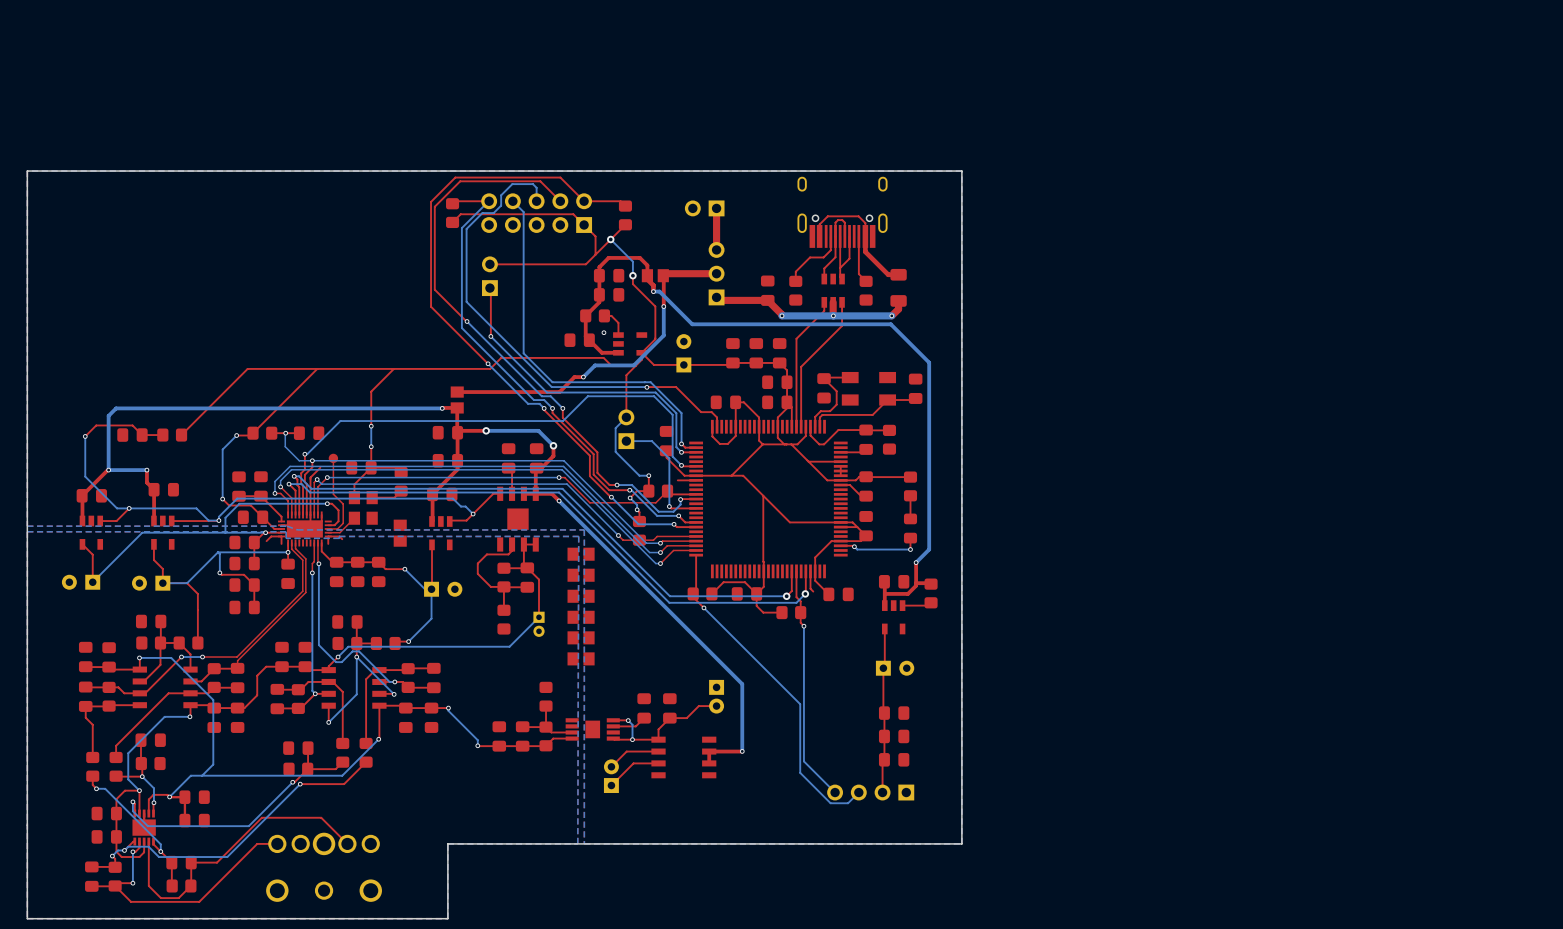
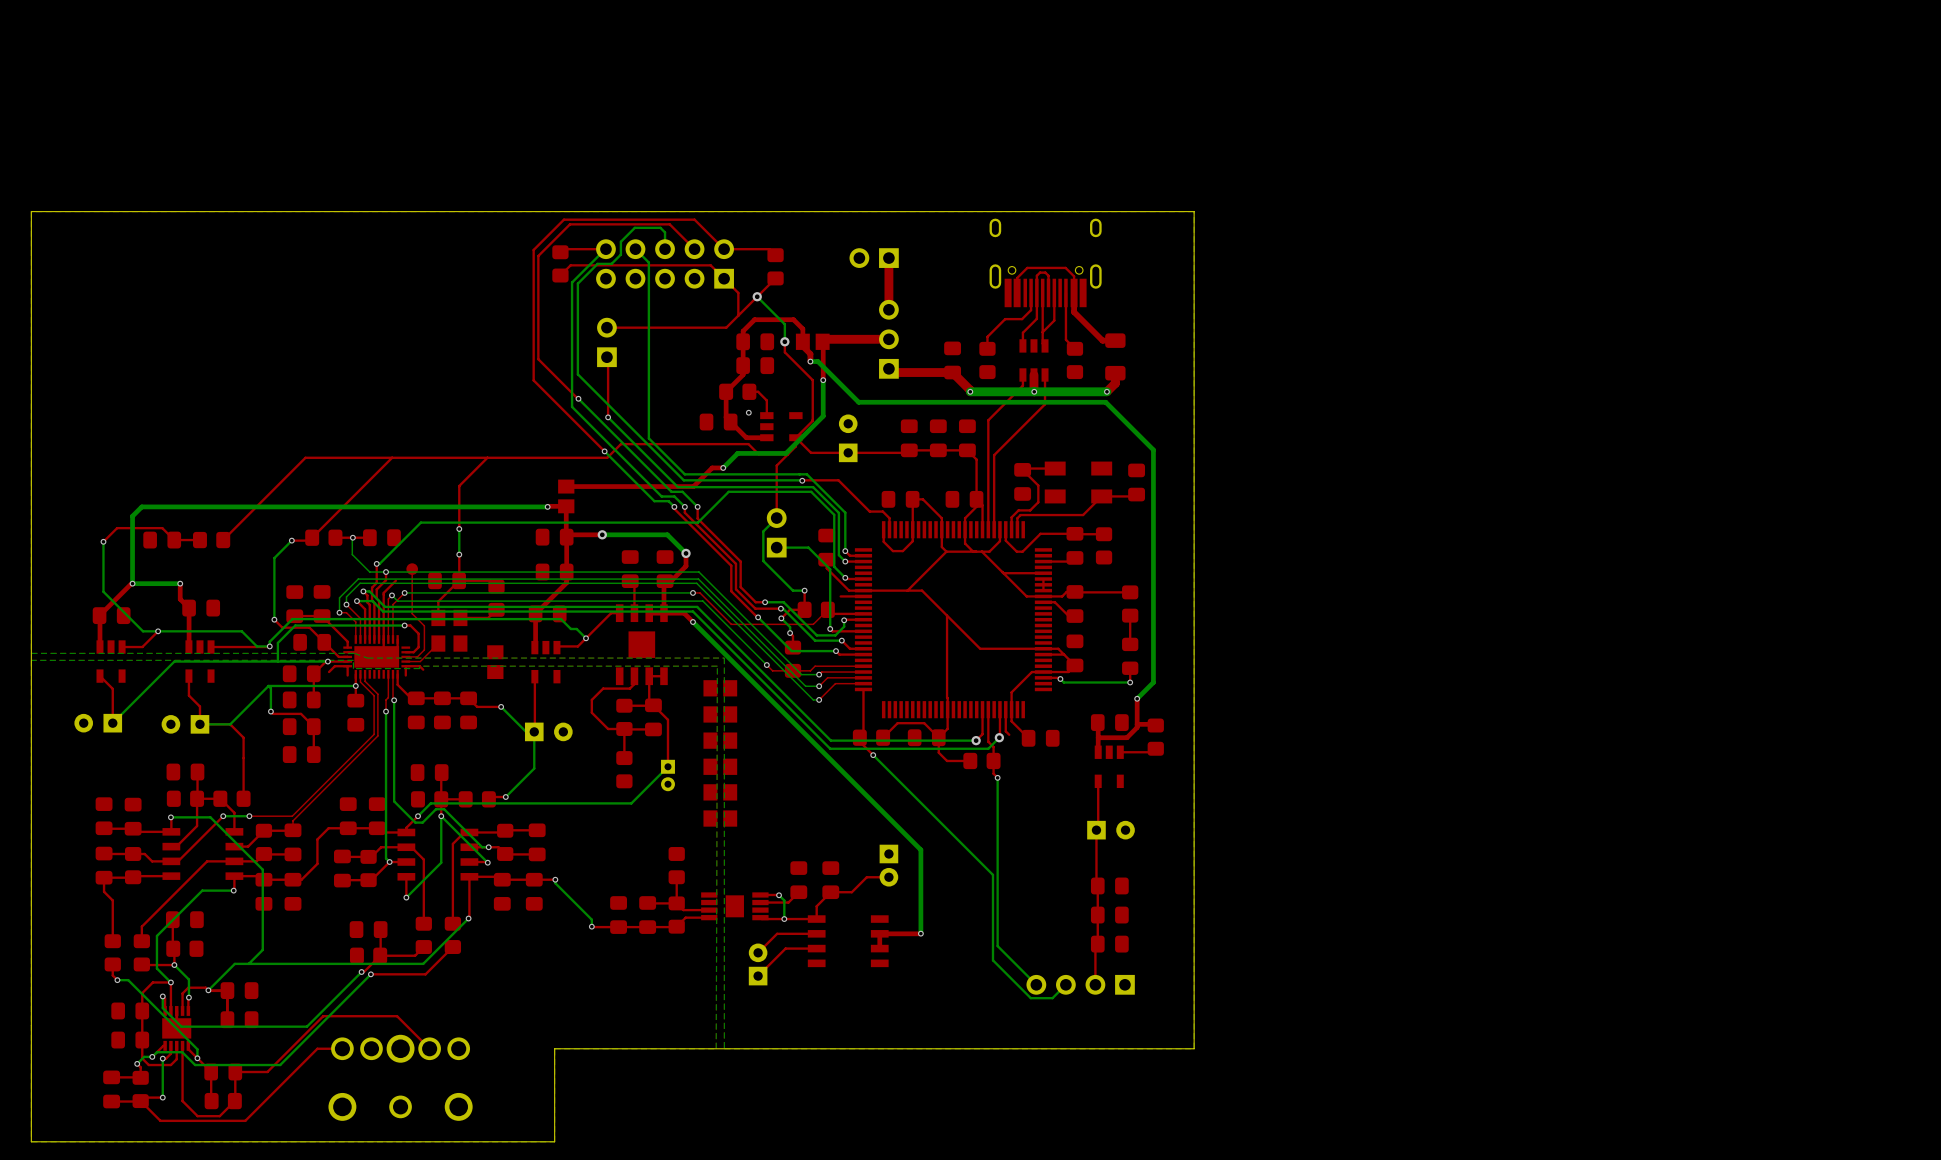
part: (777, 382) -> none

